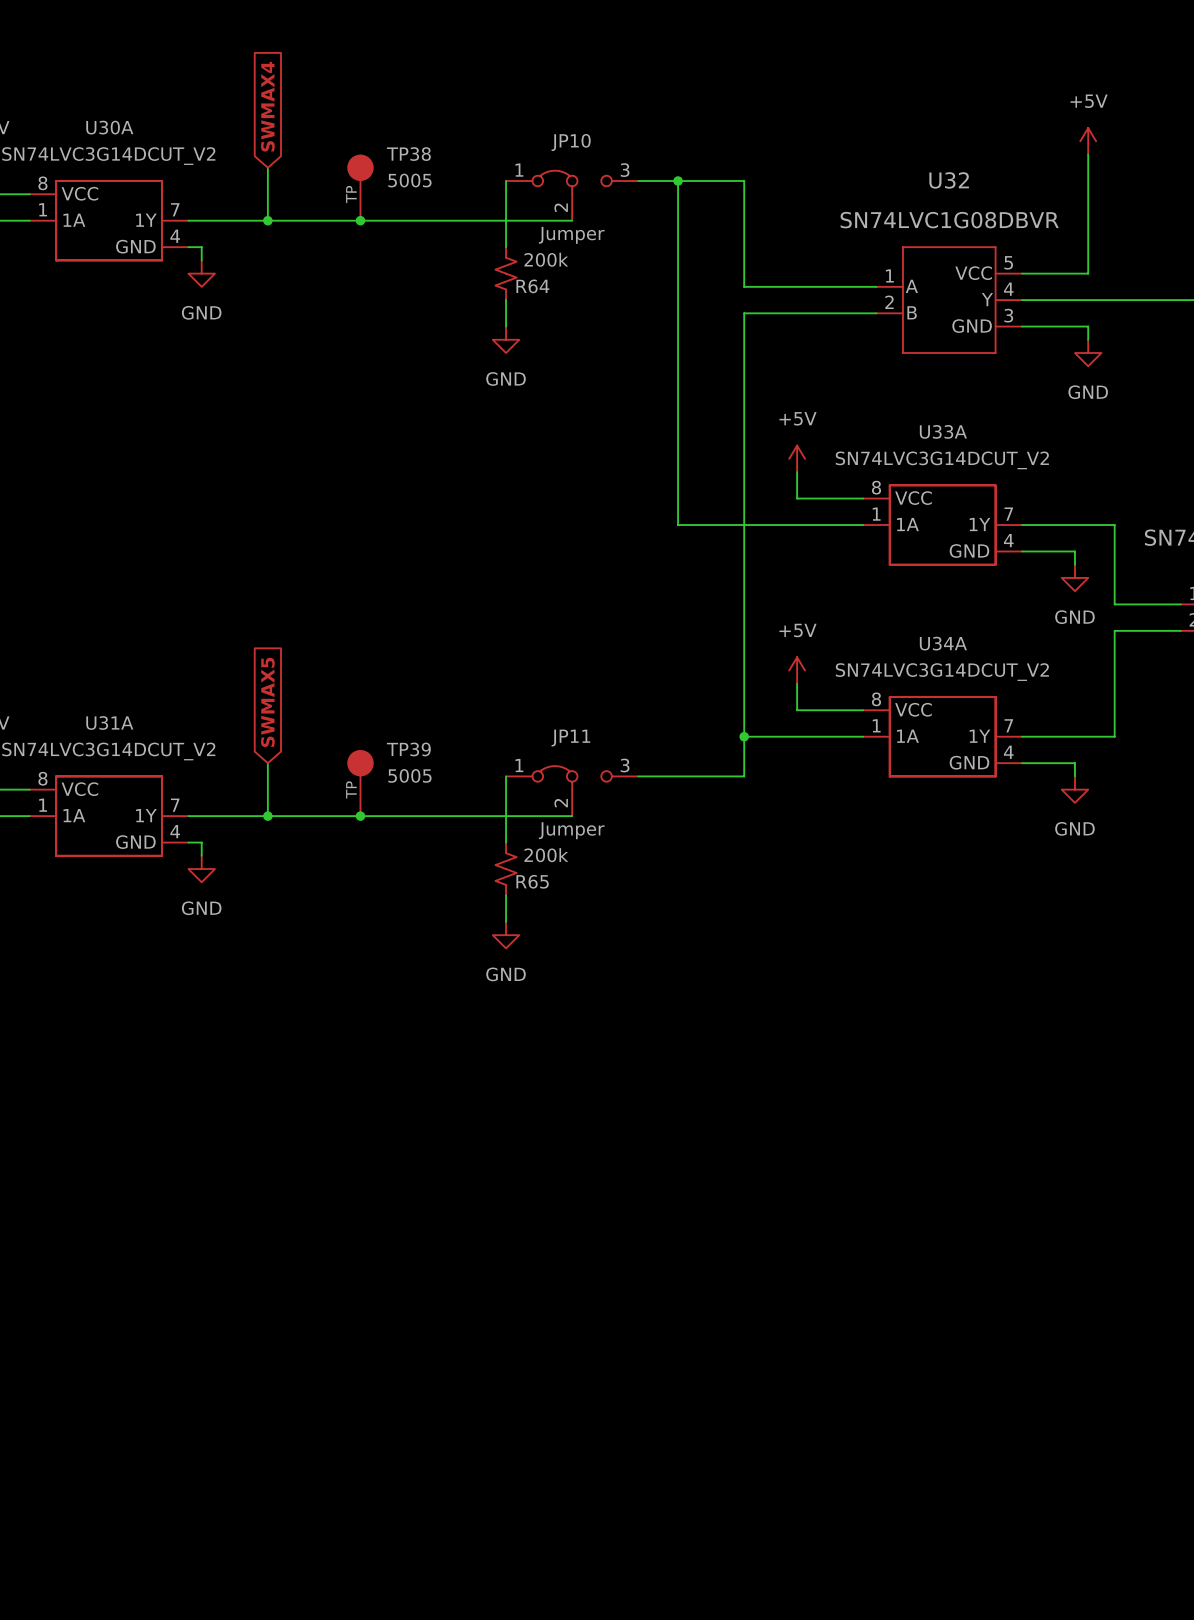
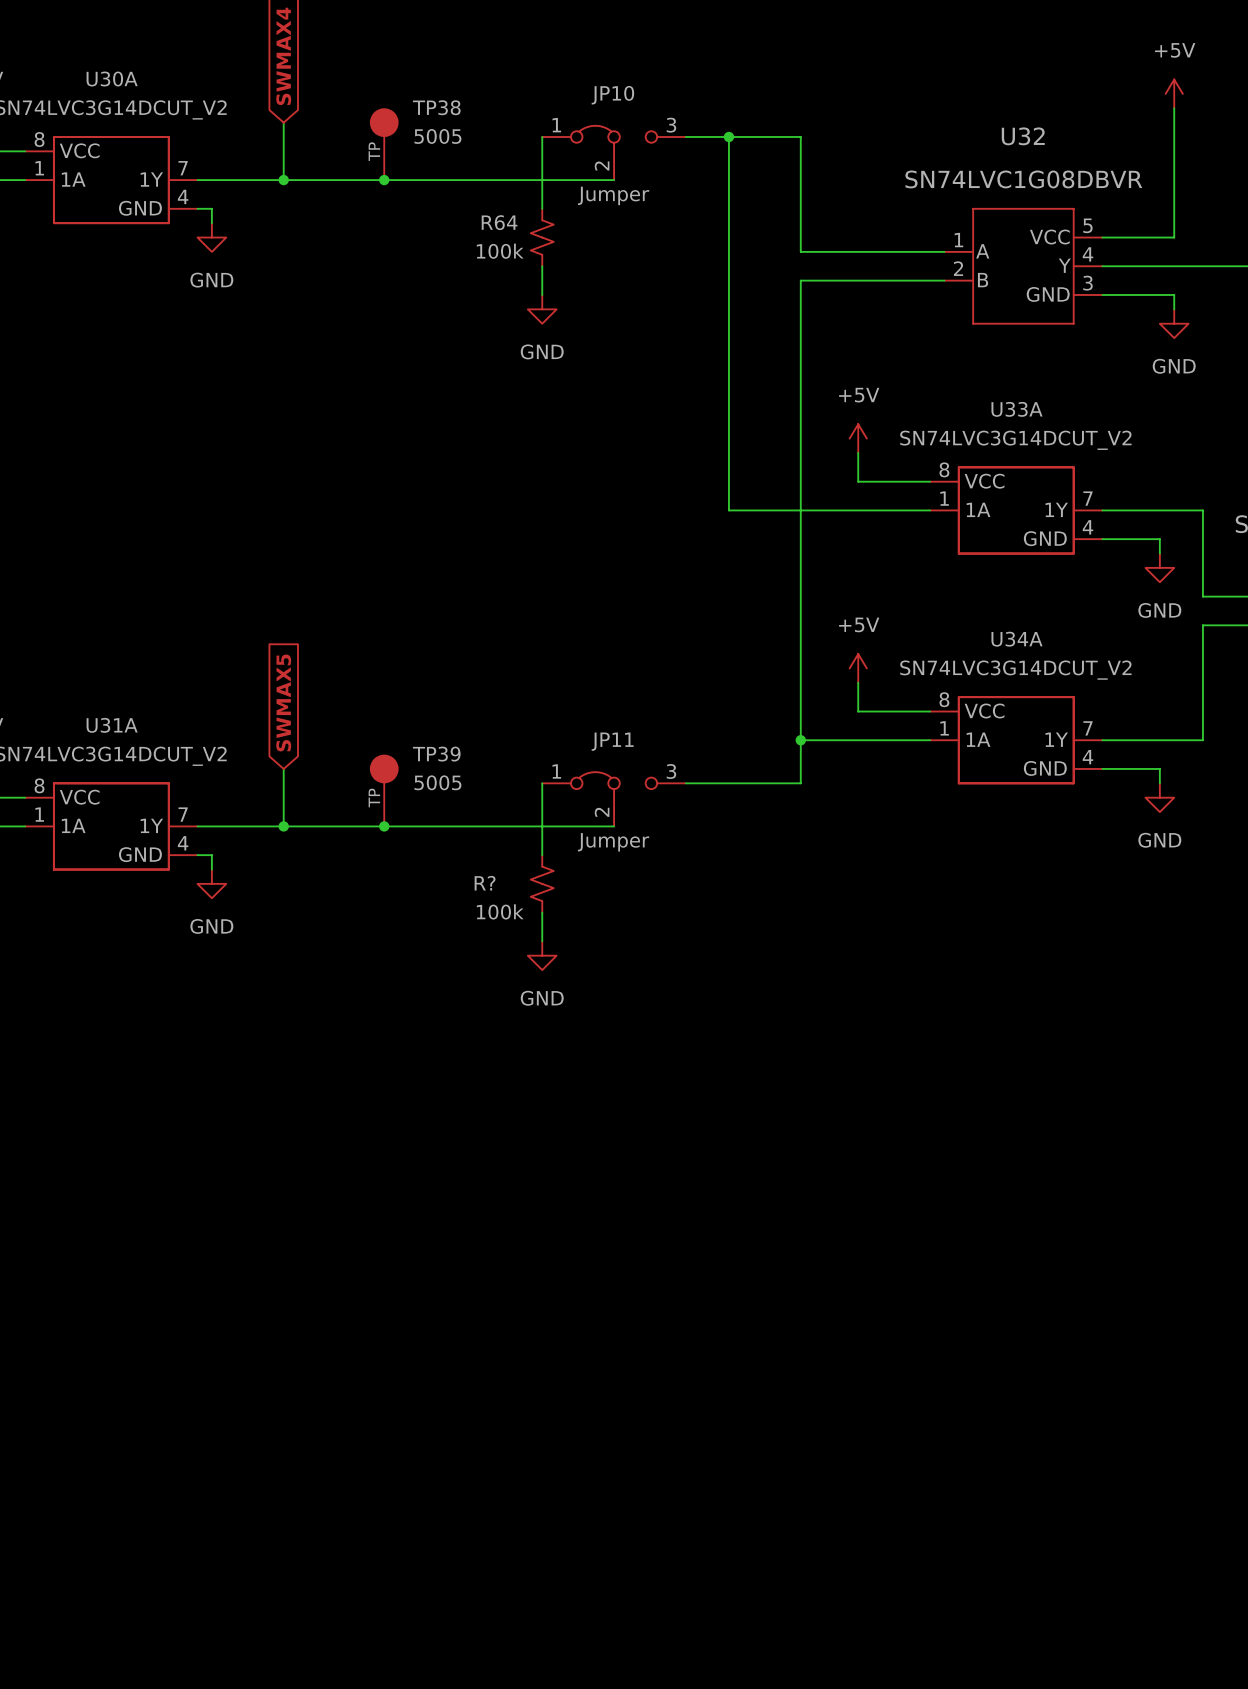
R64 value: 200k (546, 259) -> 100k (500, 251)
R64 name position: R64 (532, 286) -> R64 (499, 222)
R65 value: 200k (546, 855) -> 100k (500, 911)
R65 name: R65 (532, 881) -> R? (485, 883)

